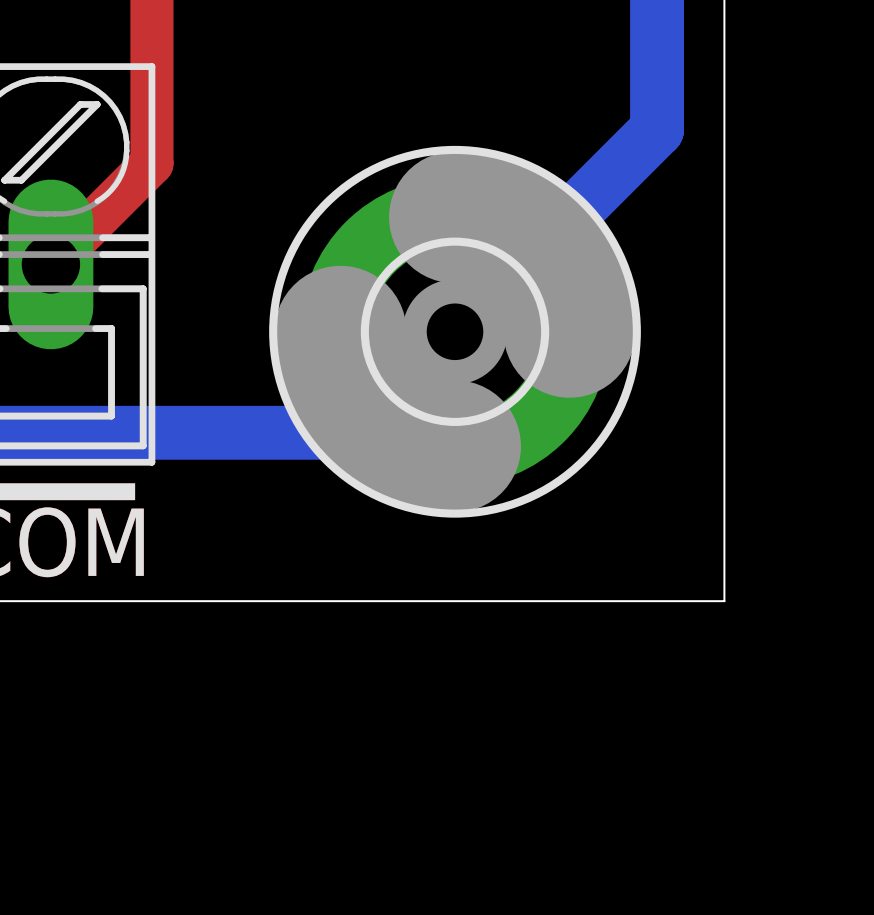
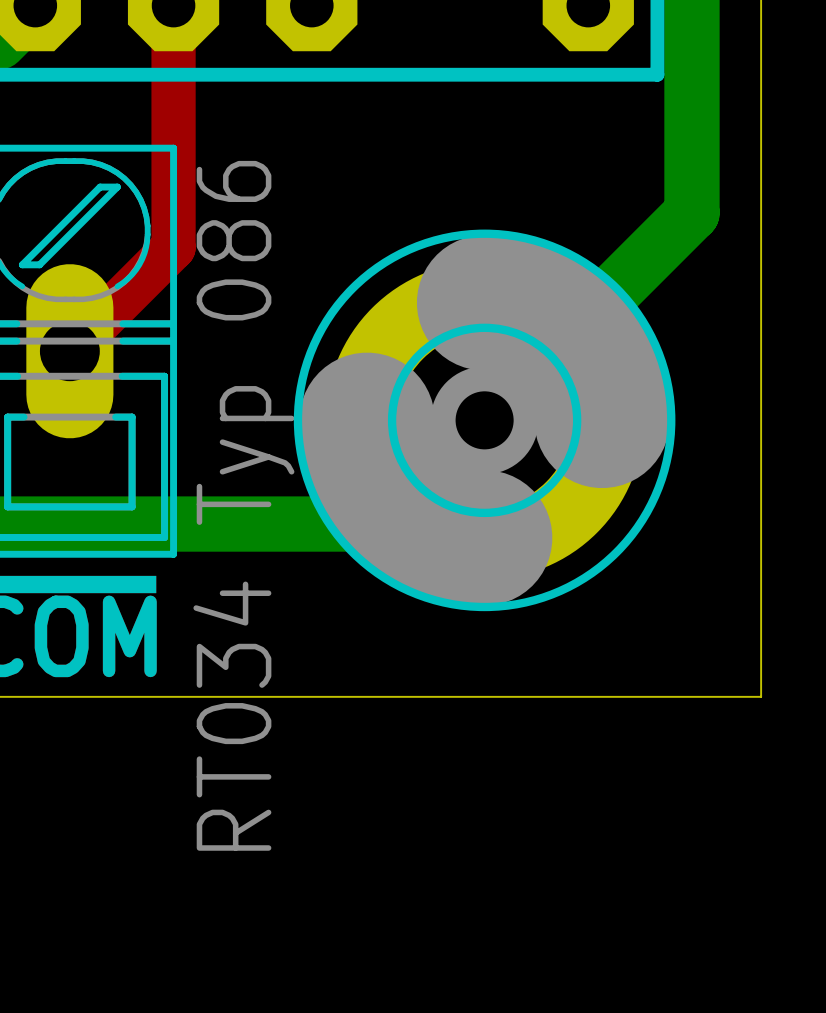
part value: none -> RT034 Typ 086 (243, 505)

